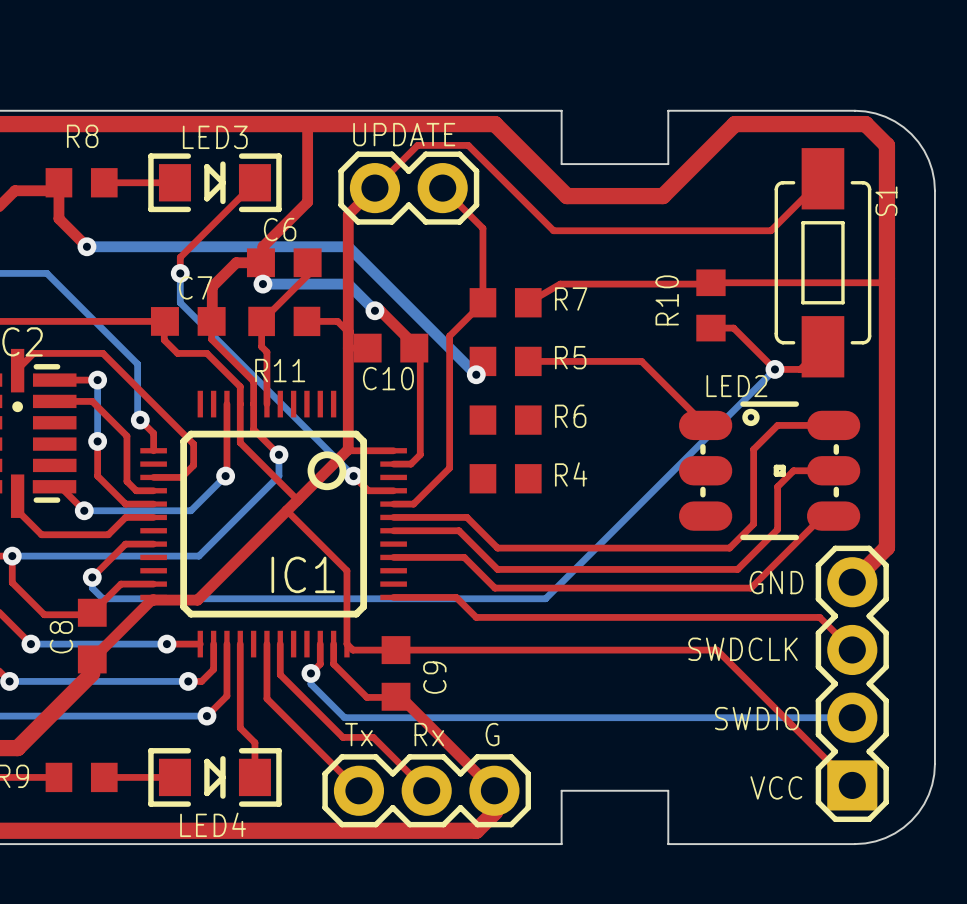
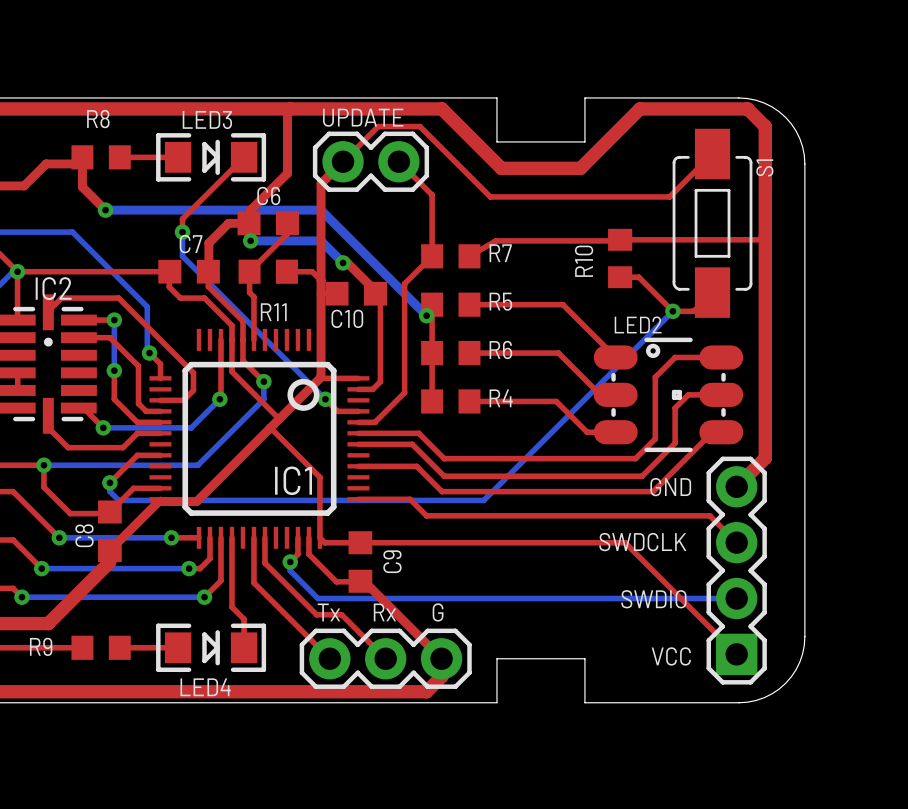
top track: none -> (432, 304) (432, 401)
top track: none -> (469, 353) (558, 353) (600, 394) (615, 394)
top track: none -> (469, 401) (556, 401) (587, 432) (615, 432)

